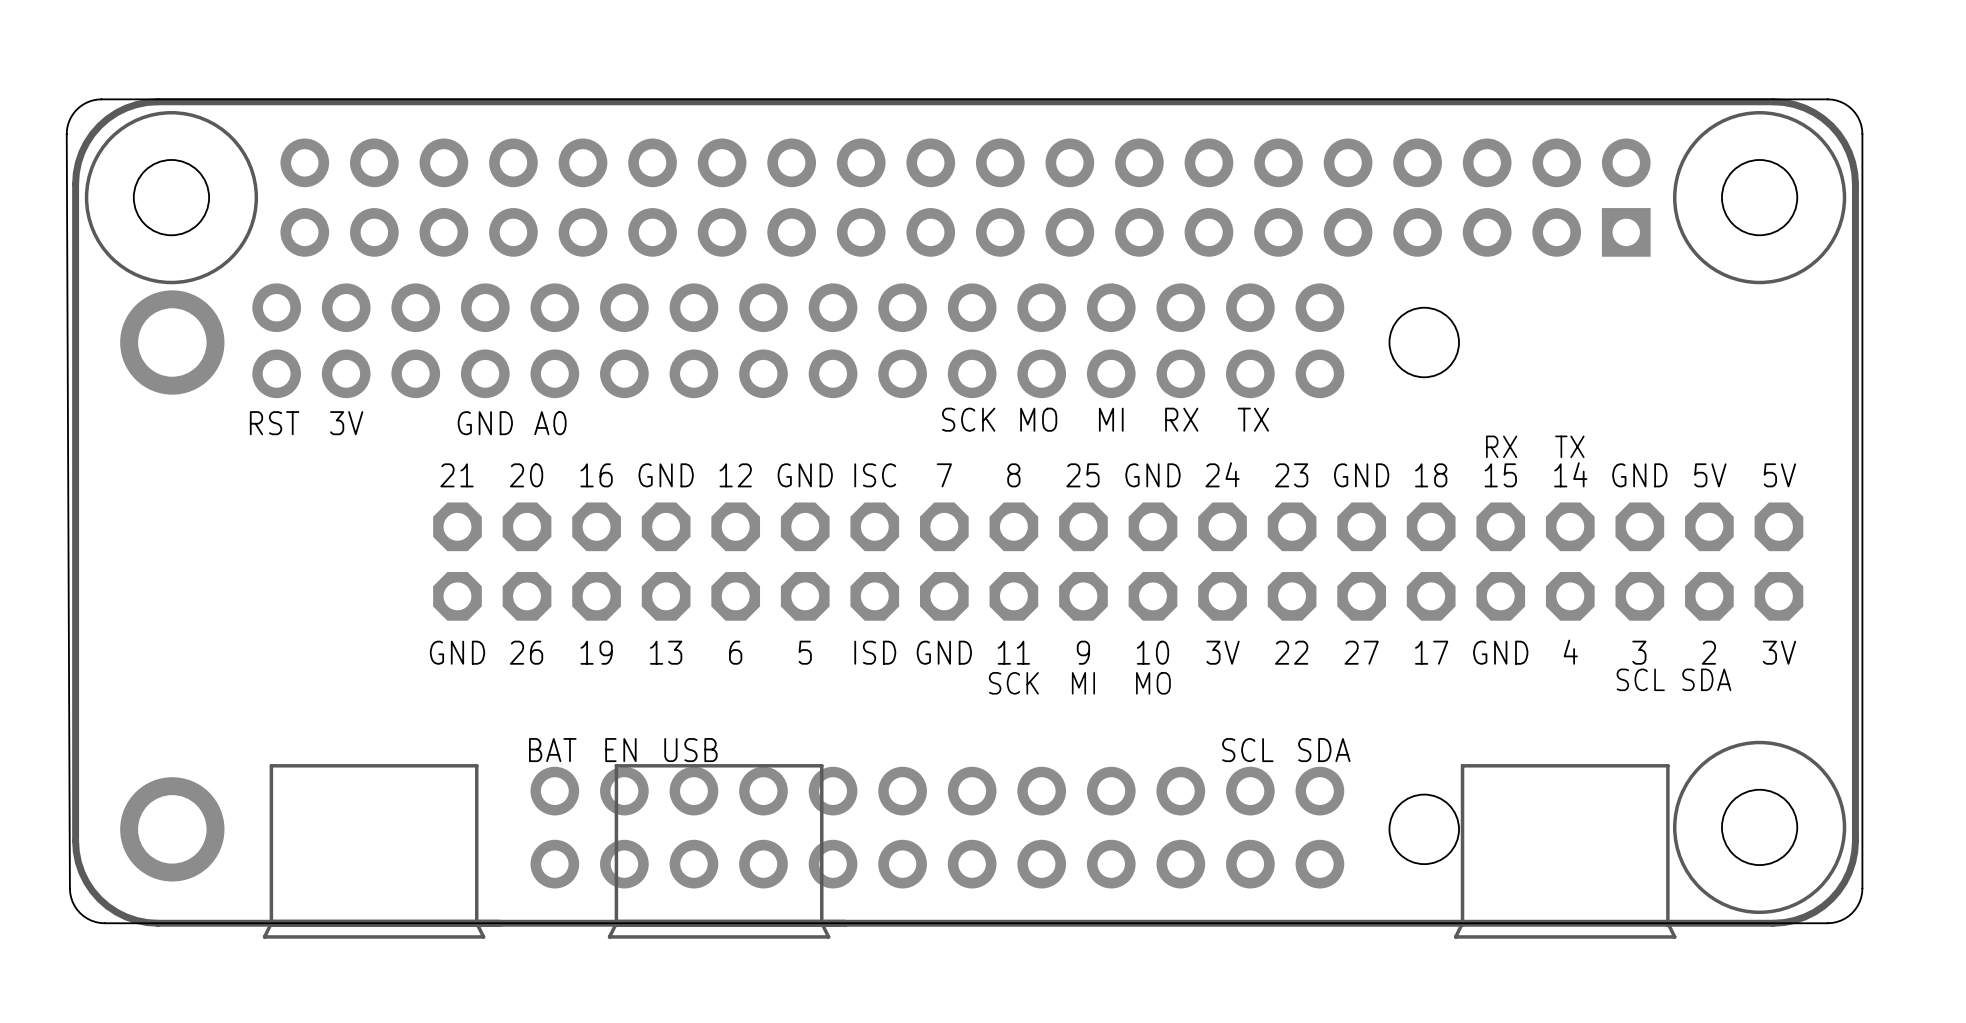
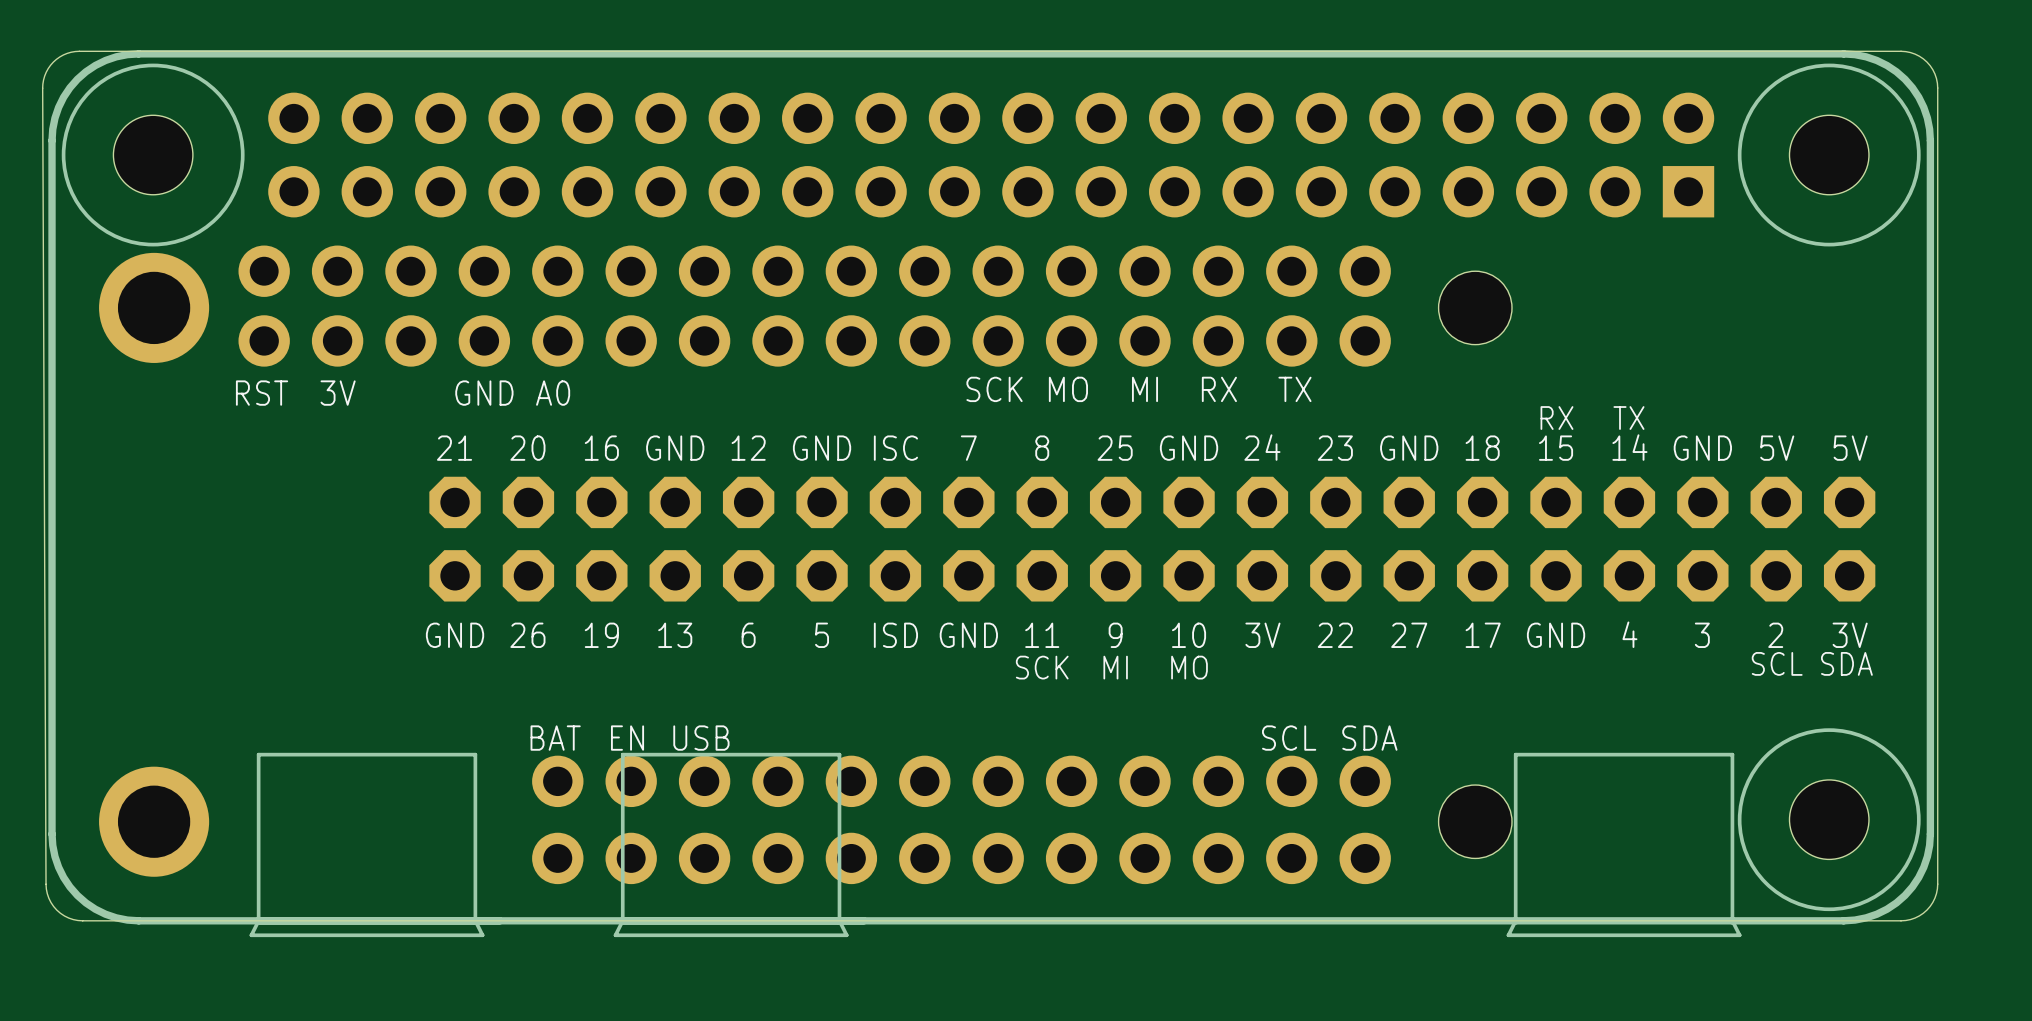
text: SCL (1640, 679) -> none
text: SDA (1706, 679) -> SCL (1777, 663)
text: none -> SDA (1846, 663)

